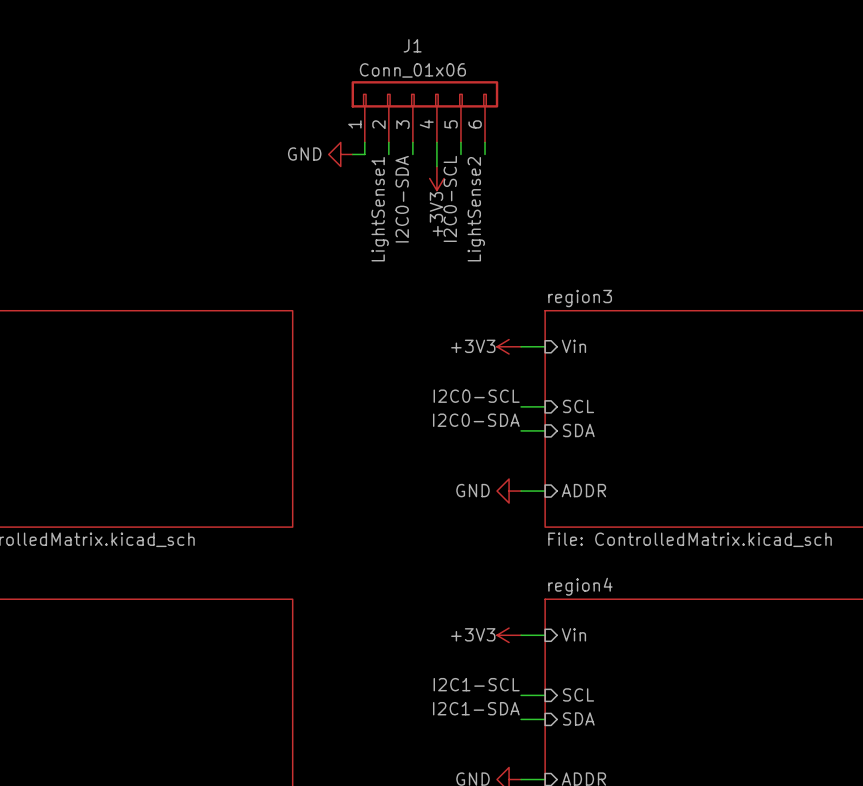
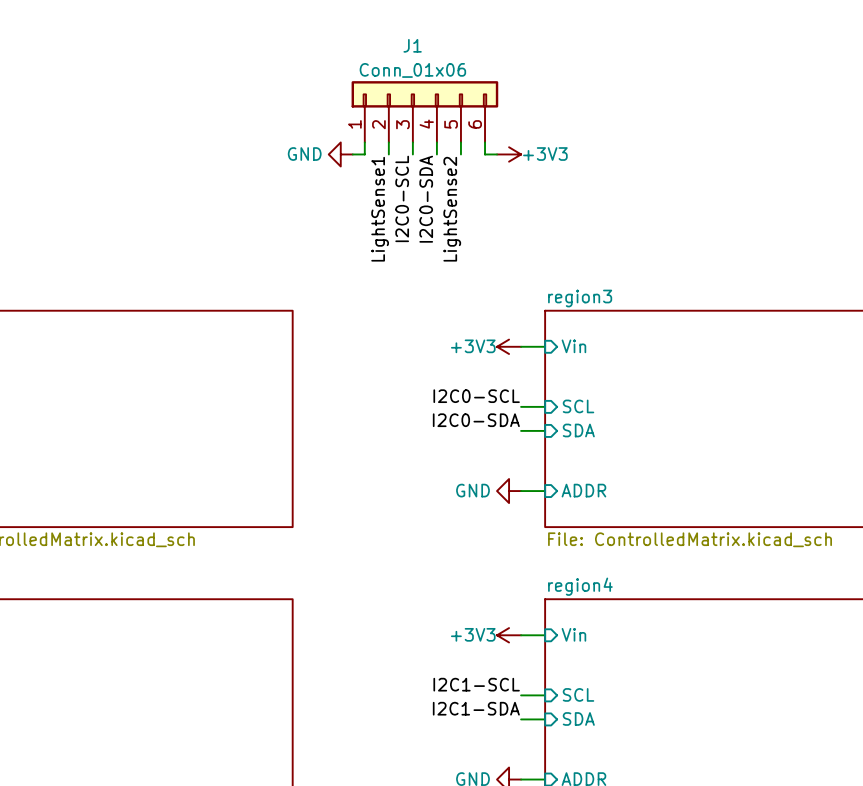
wire: (436, 154) (436, 166) -> none
wire: none -> (485, 154) (497, 154)
power symbol rotation: 0° (436, 178) -> 90° counterclockwise (509, 154)
power symbol position: +3V3 (436, 178) -> +3V3 (509, 154)
label: I2C0-SCL (450, 198) -> LightSense2 (452, 209)
label: I2C0-SDA (402, 199) -> I2C0-SCL (402, 198)
label: none -> I2C0-SDA (426, 199)
label: LightSense2 (476, 209) -> none

